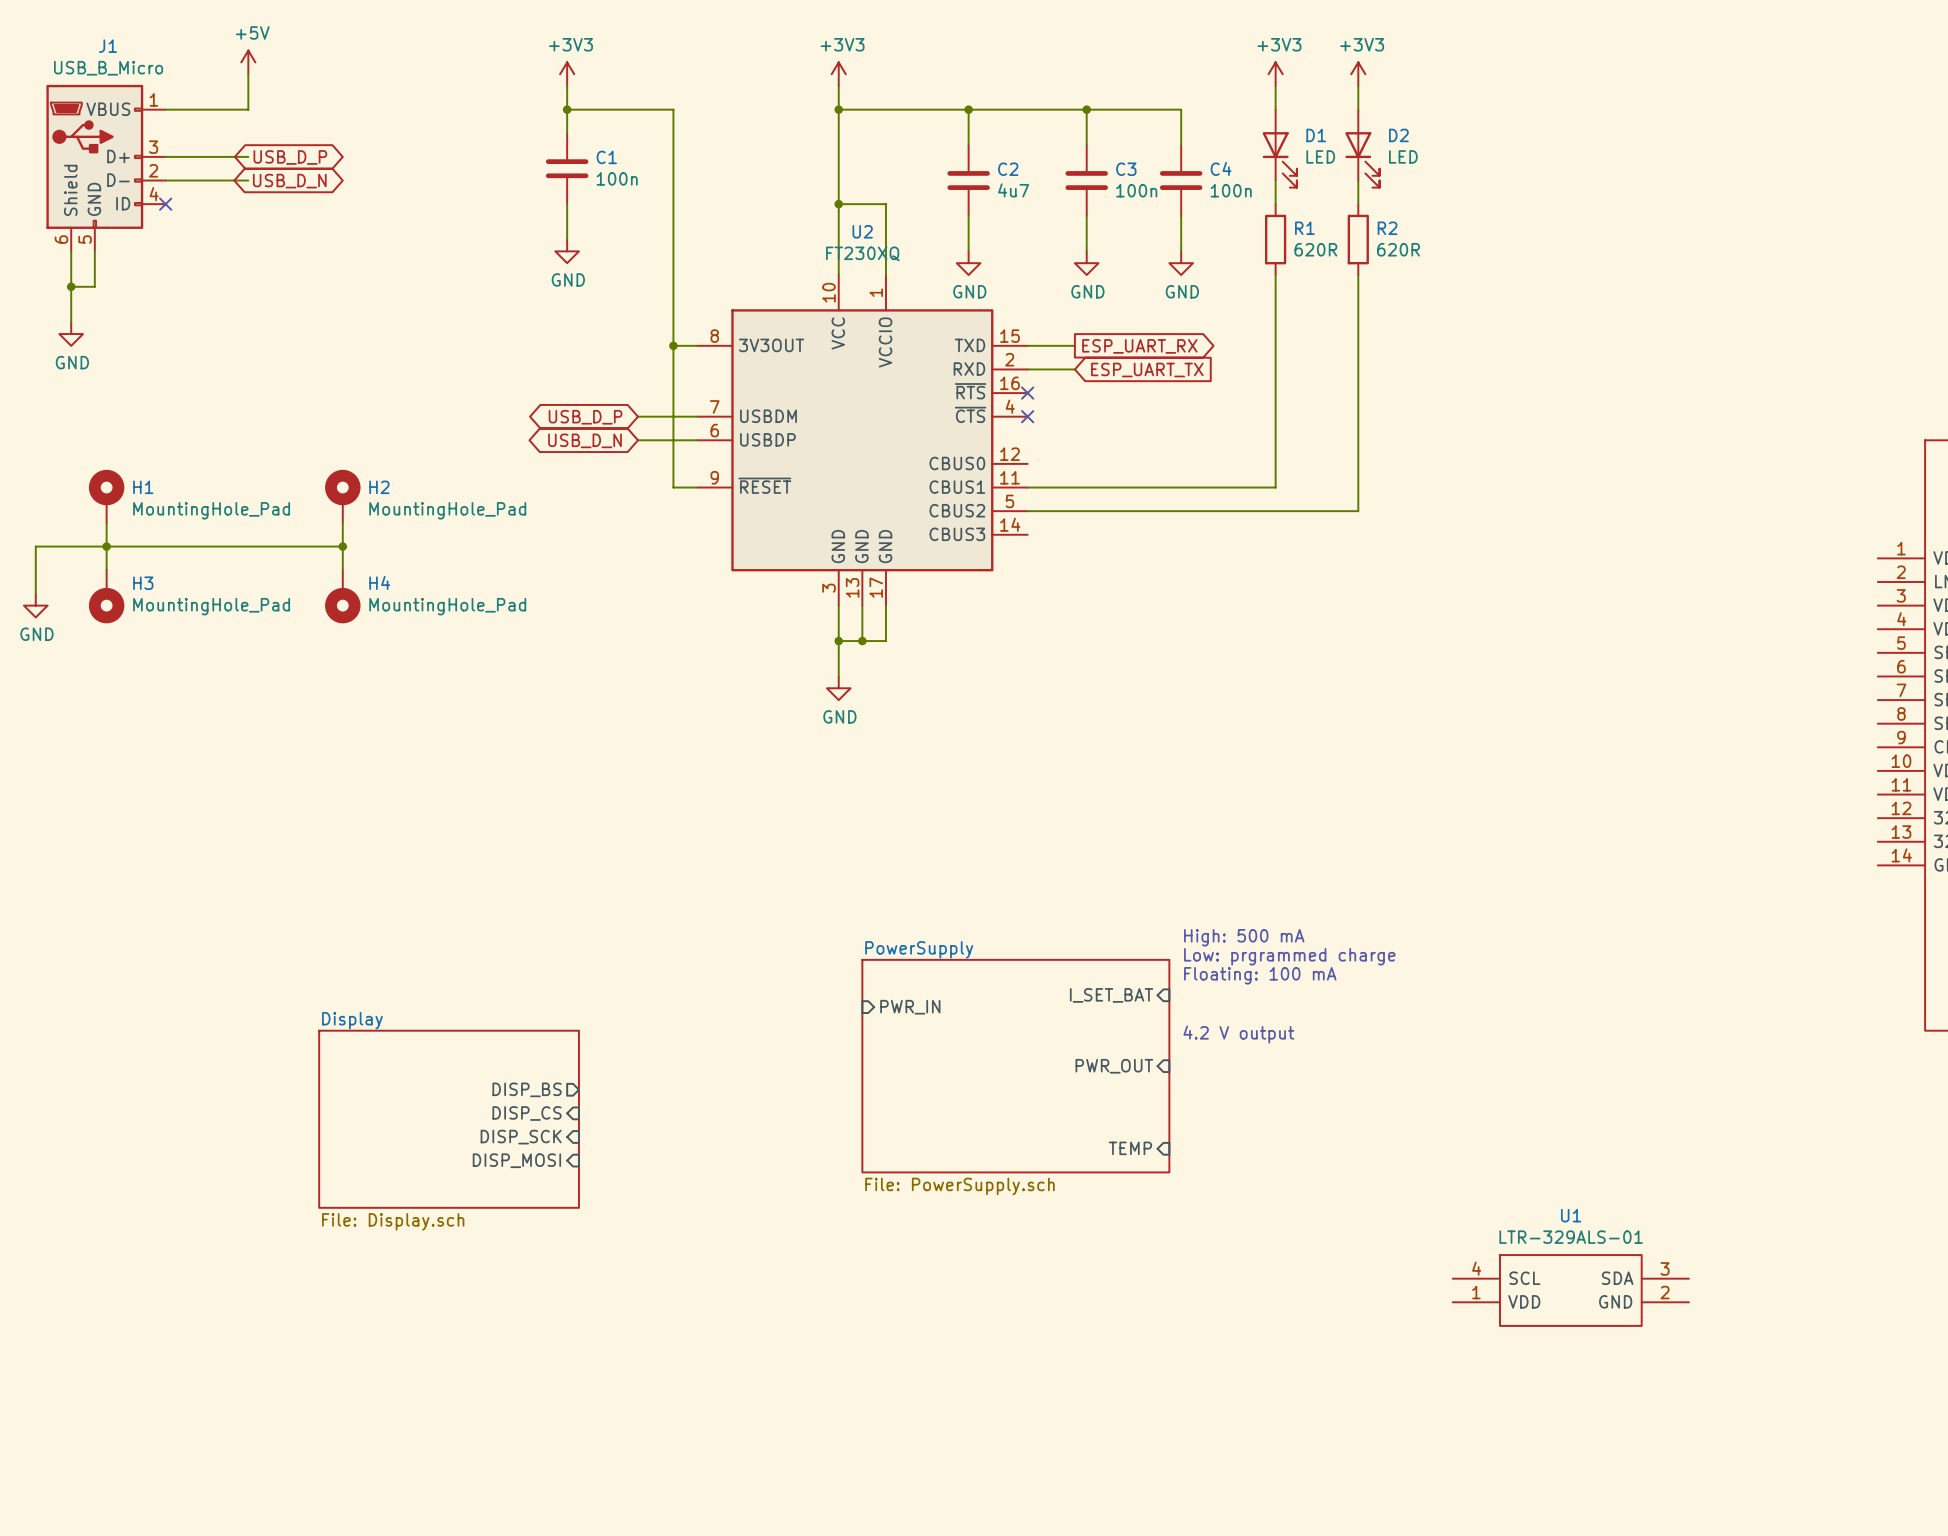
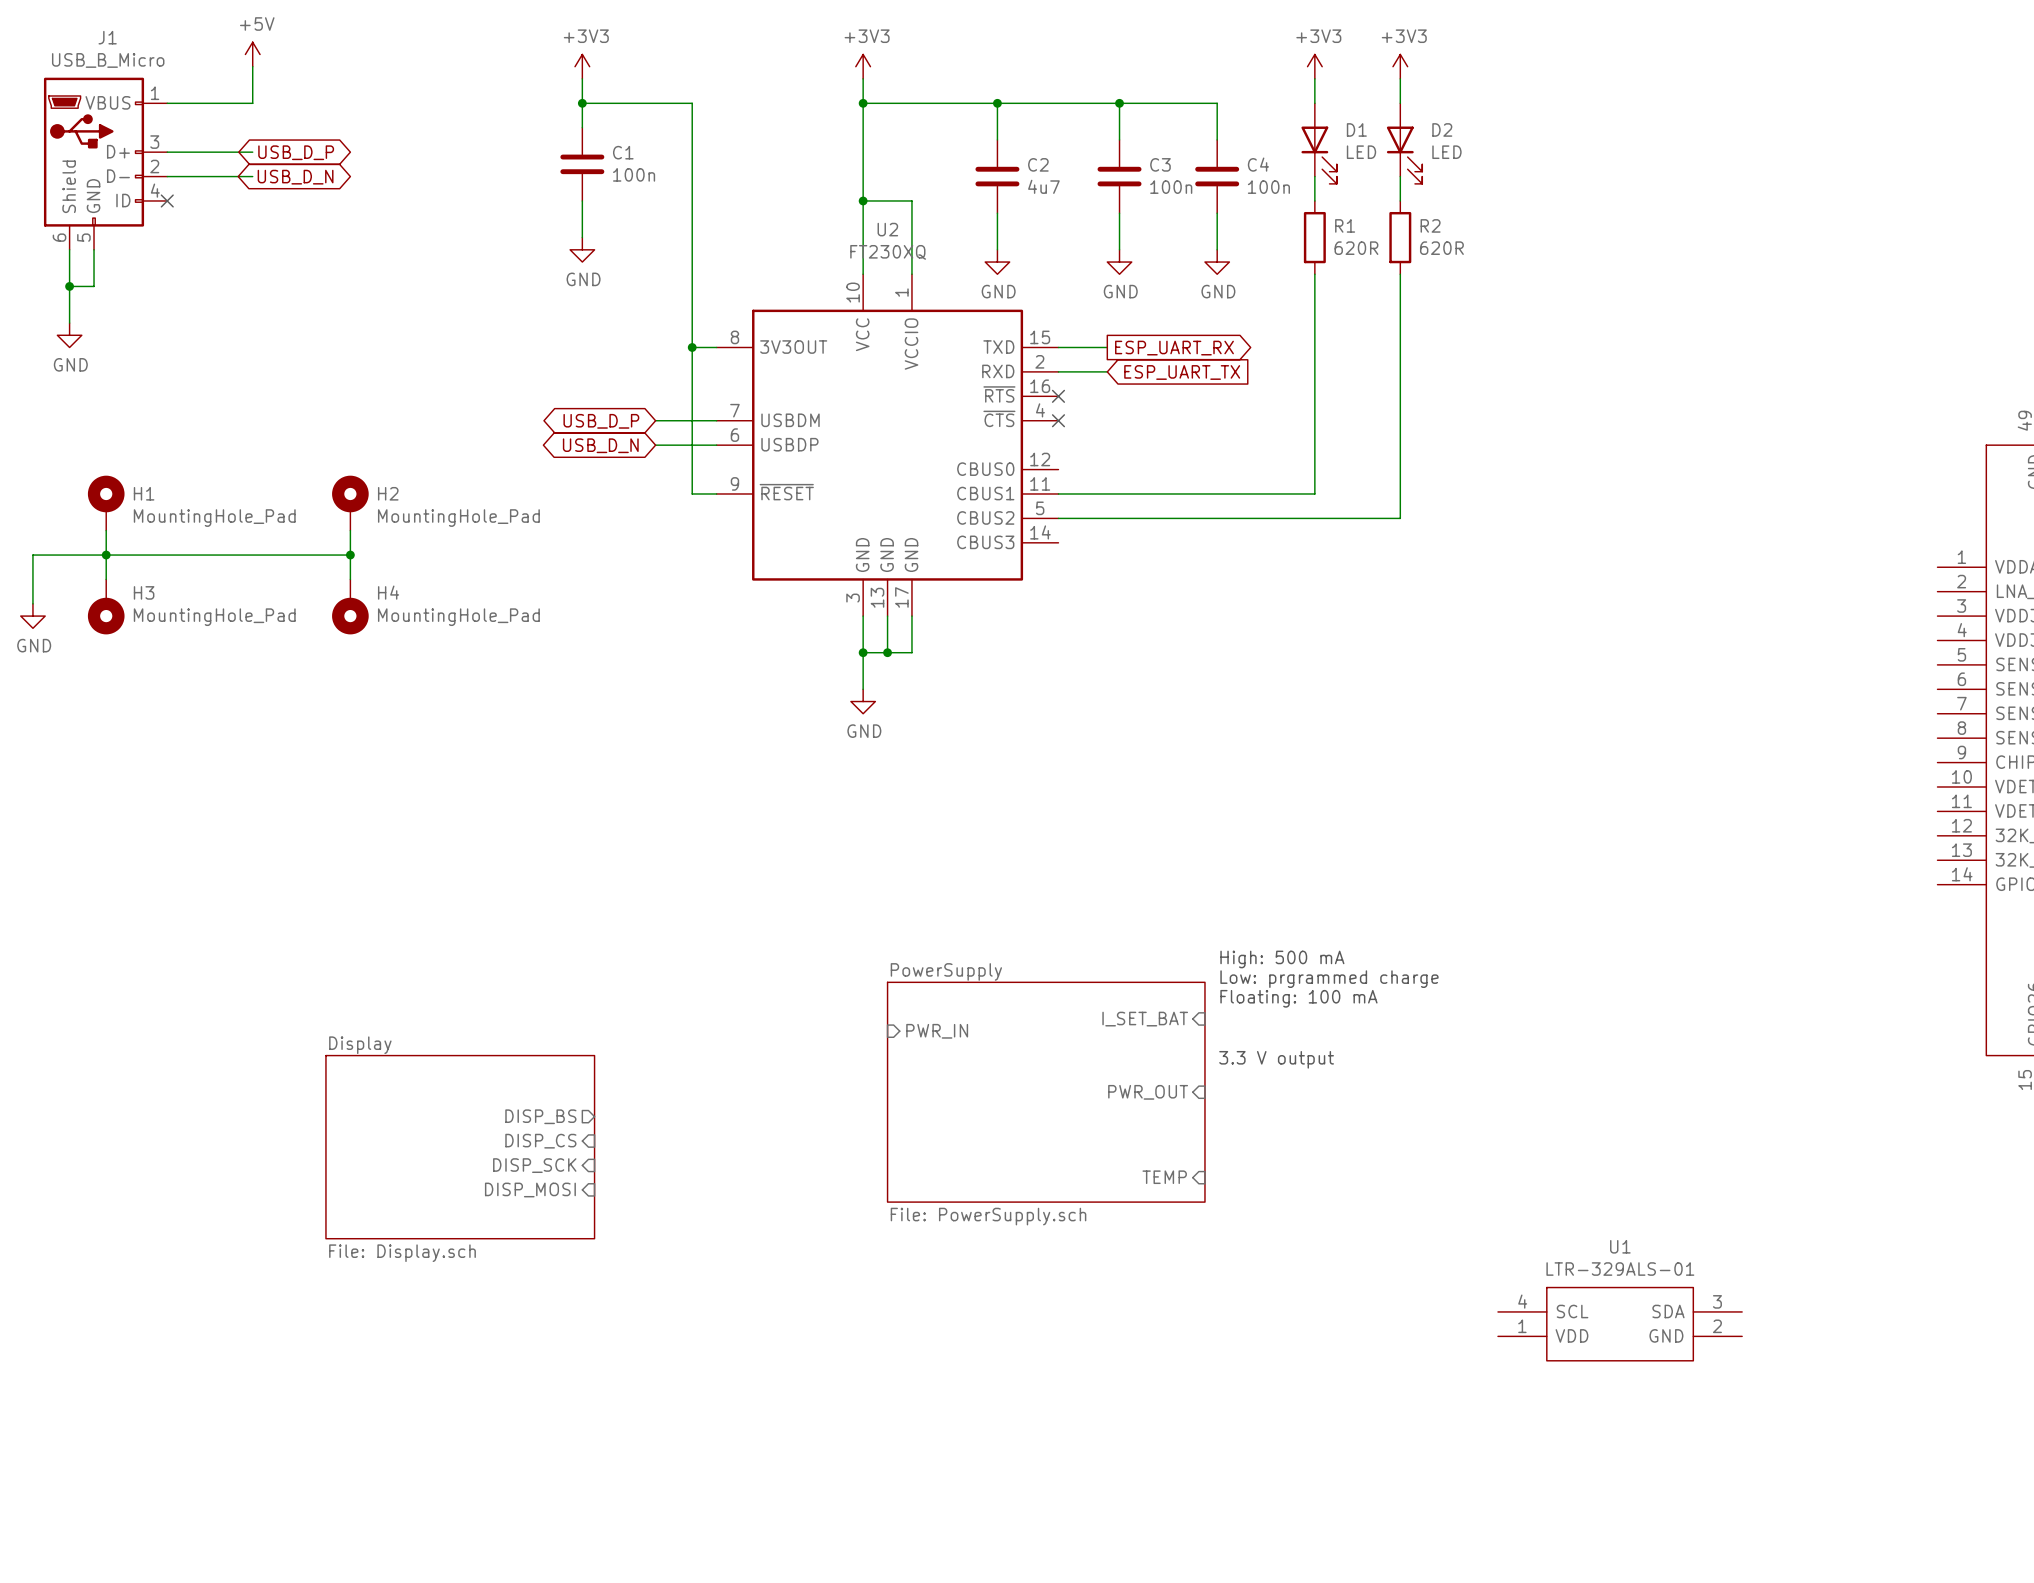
text: 4.2 V output (1238, 1034) -> 3.3 V output (1276, 1059)

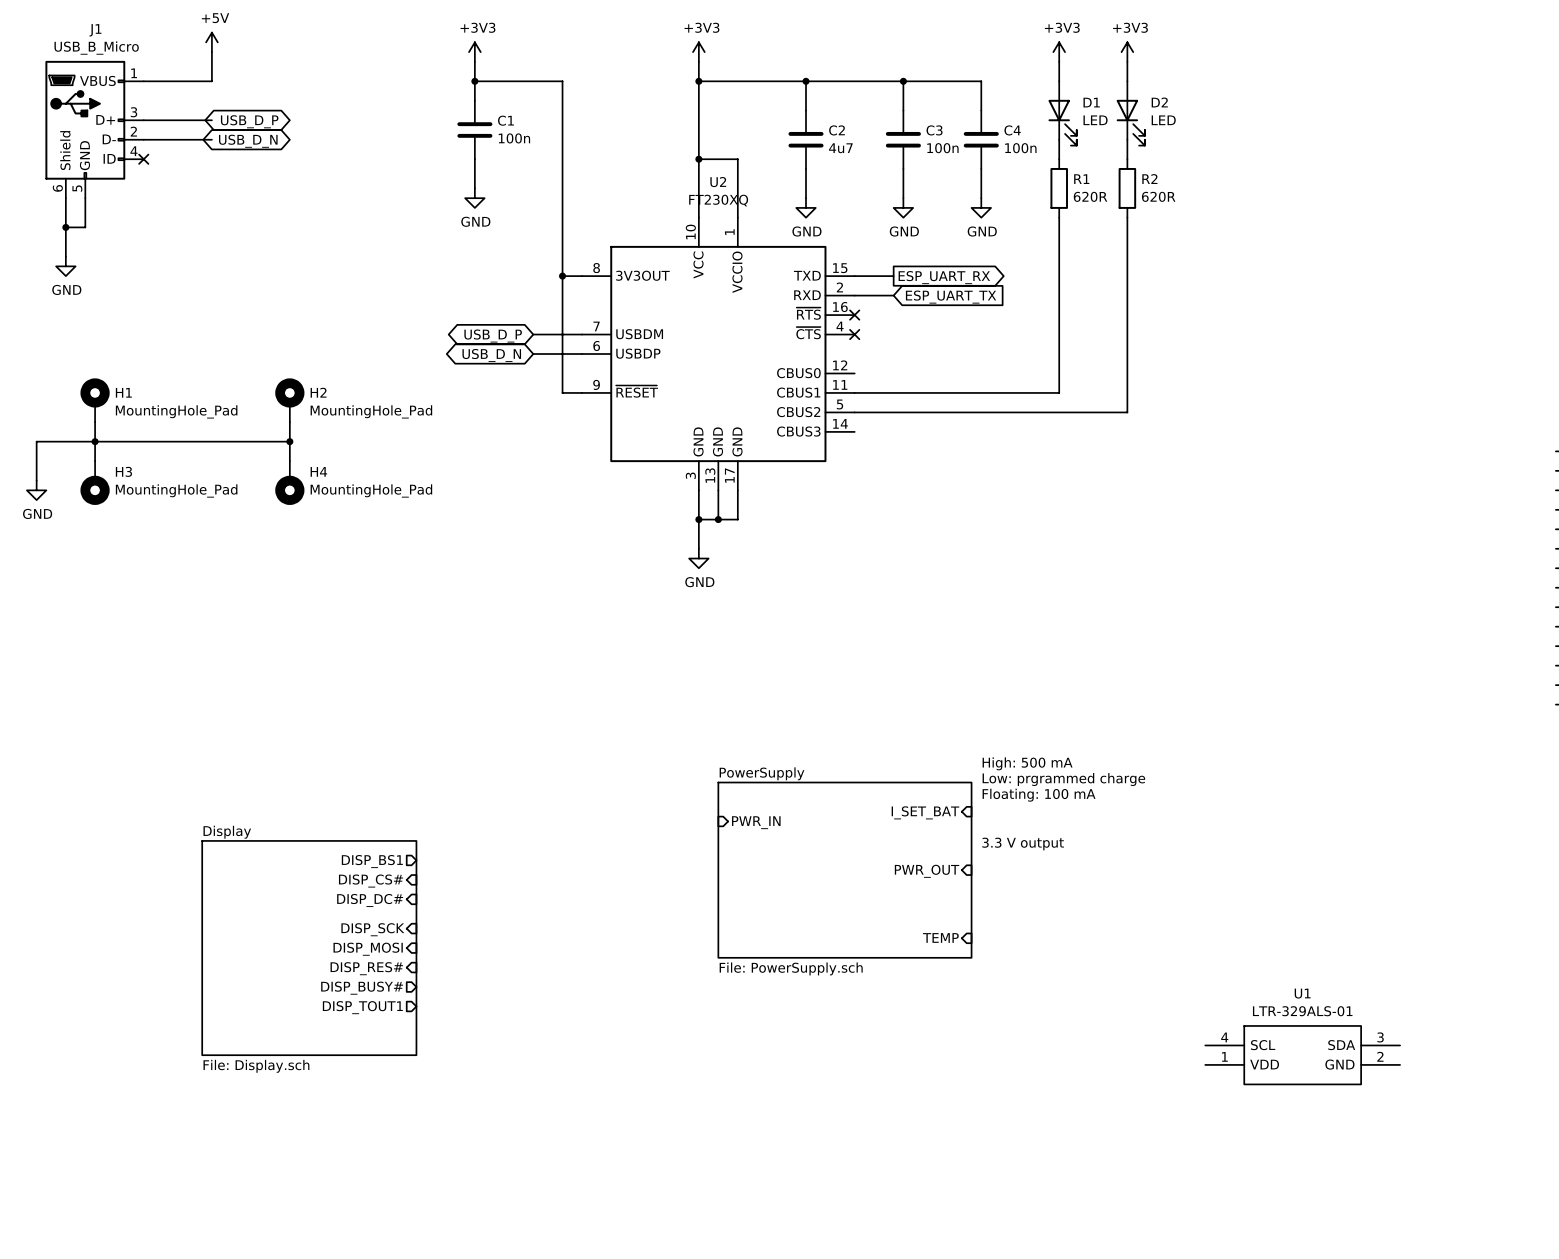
sheet pin: none -> DISP_BS1 (372, 861)
sheet pin: none -> DISP_CS# (371, 881)
sheet pin: DISP_BS (540, 1116) -> none
sheet pin: none -> DISP_DC# (370, 900)
sheet pin: DISP_CS (540, 1141) -> none
sheet Display: File: Display.sch (460, 1147) -> none
sheet pin position: DISP_SCK (534, 1165) -> DISP_SCK (372, 929)
sheet Display: none -> File: Display.sch (309, 948)
sheet pin position: DISP_MOSI (530, 1190) -> DISP_MOSI (368, 949)
sheet pin: none -> DISP_RES# (366, 968)
sheet pin: none -> DISP_BUSY# (362, 988)
sheet pin: none -> DISP_TOUT1 (362, 1007)

